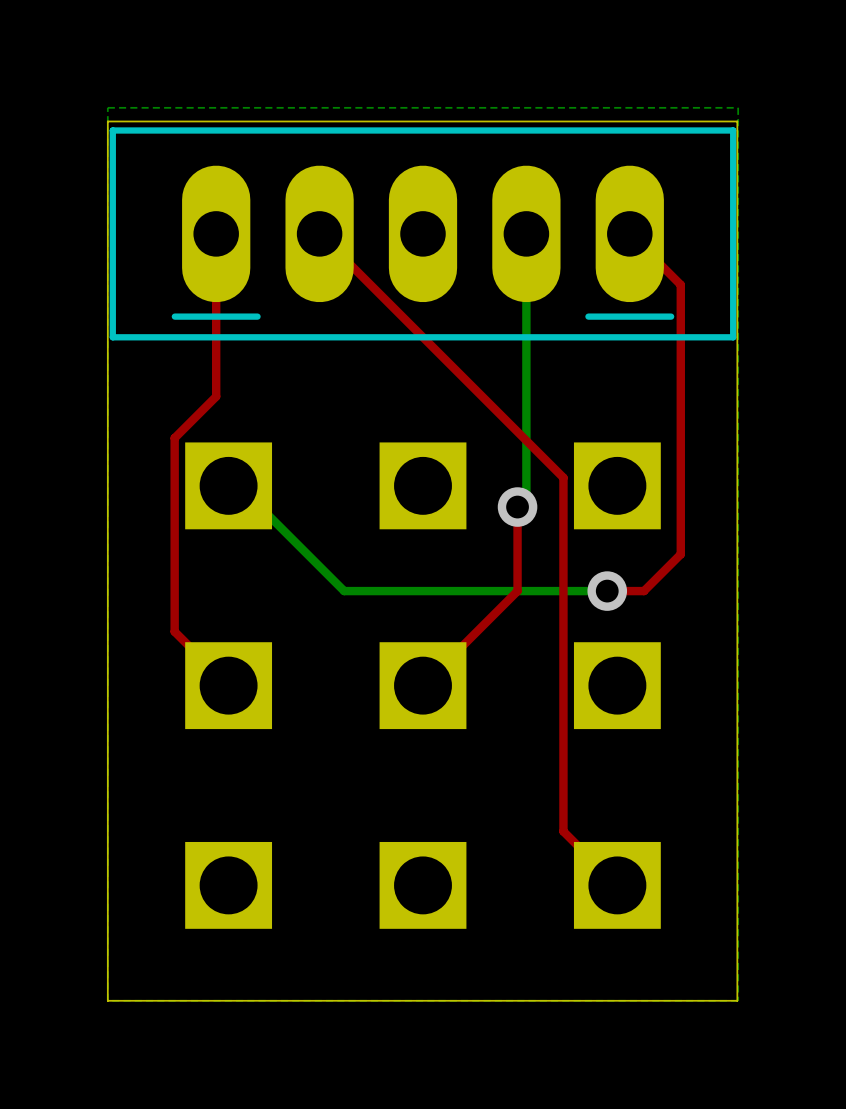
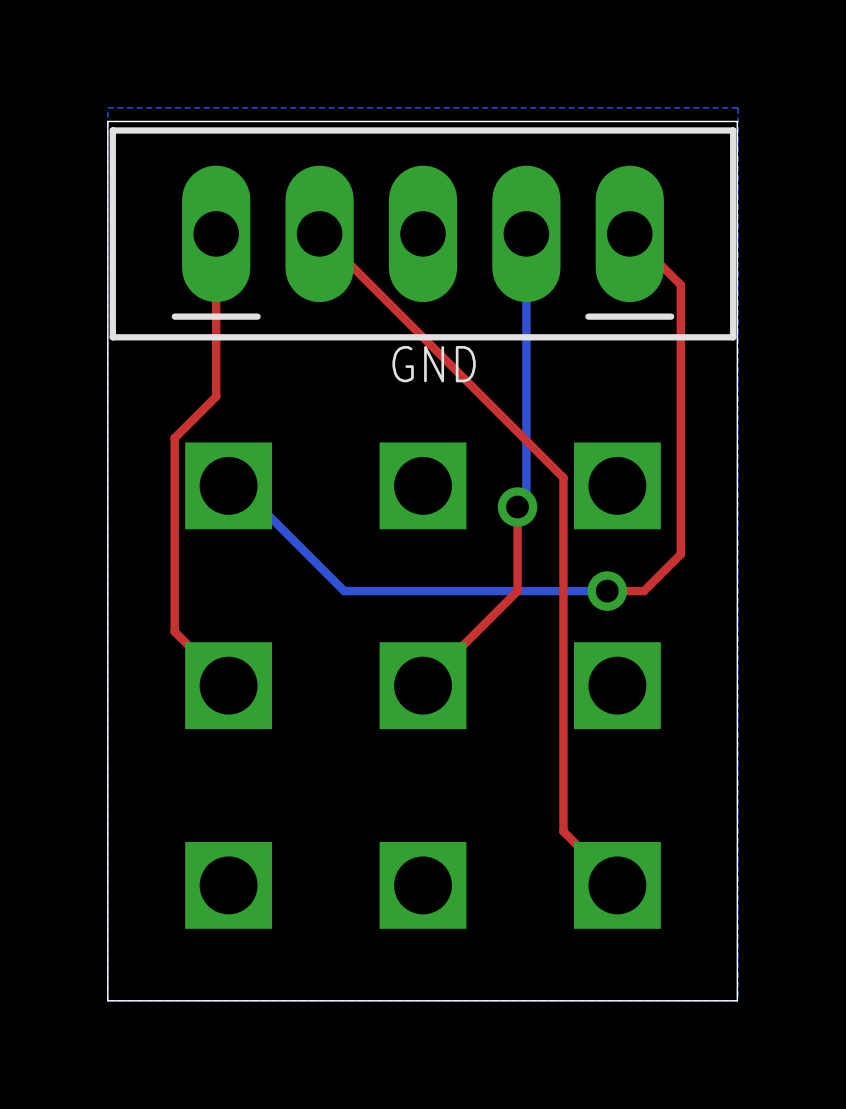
text: none -> GND (434, 364)

